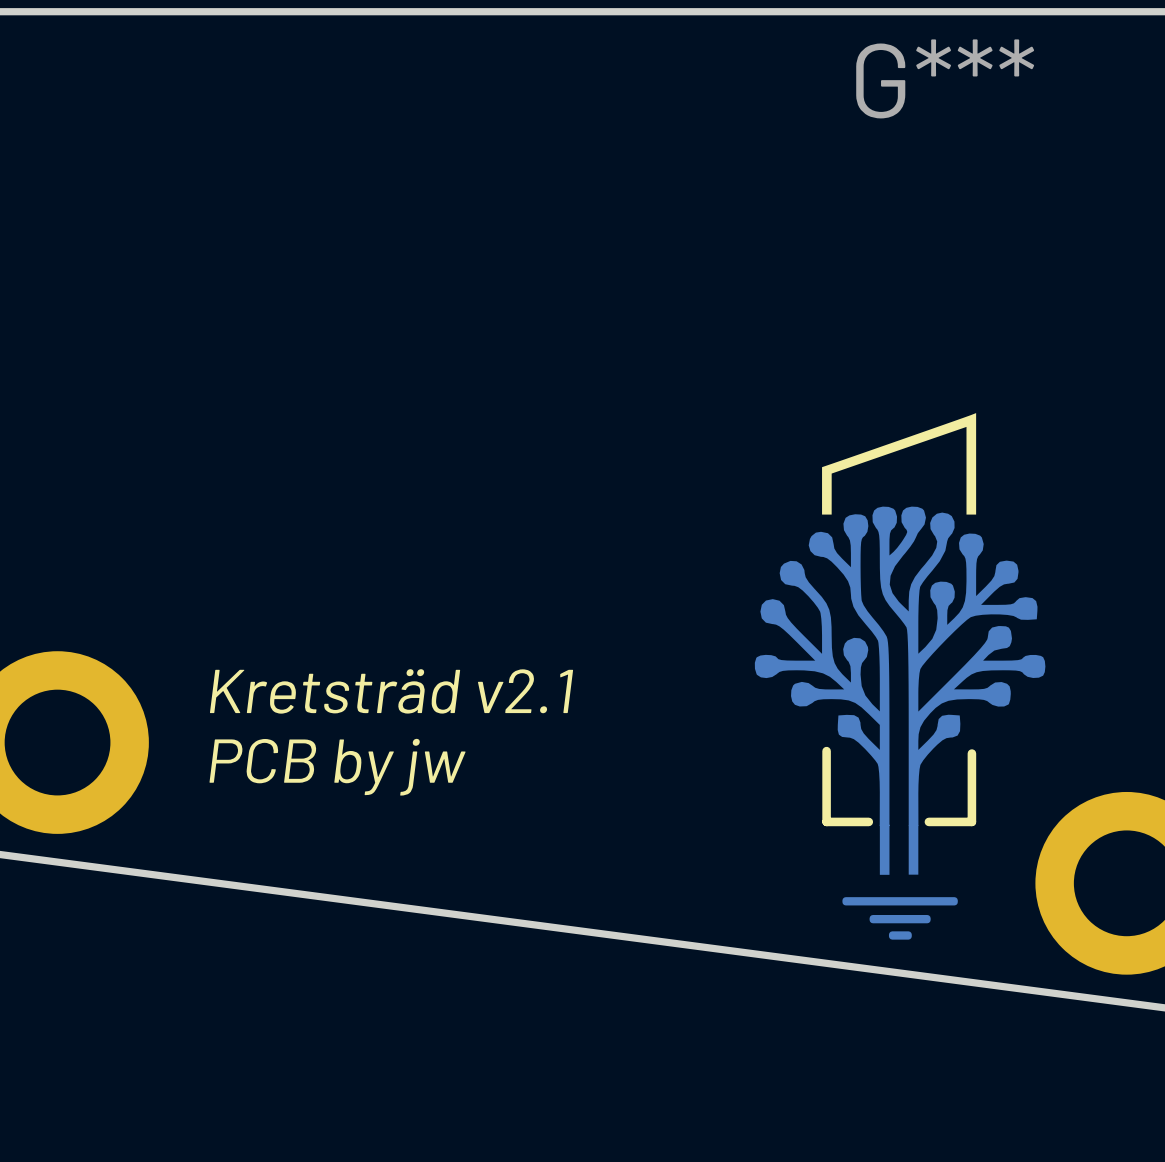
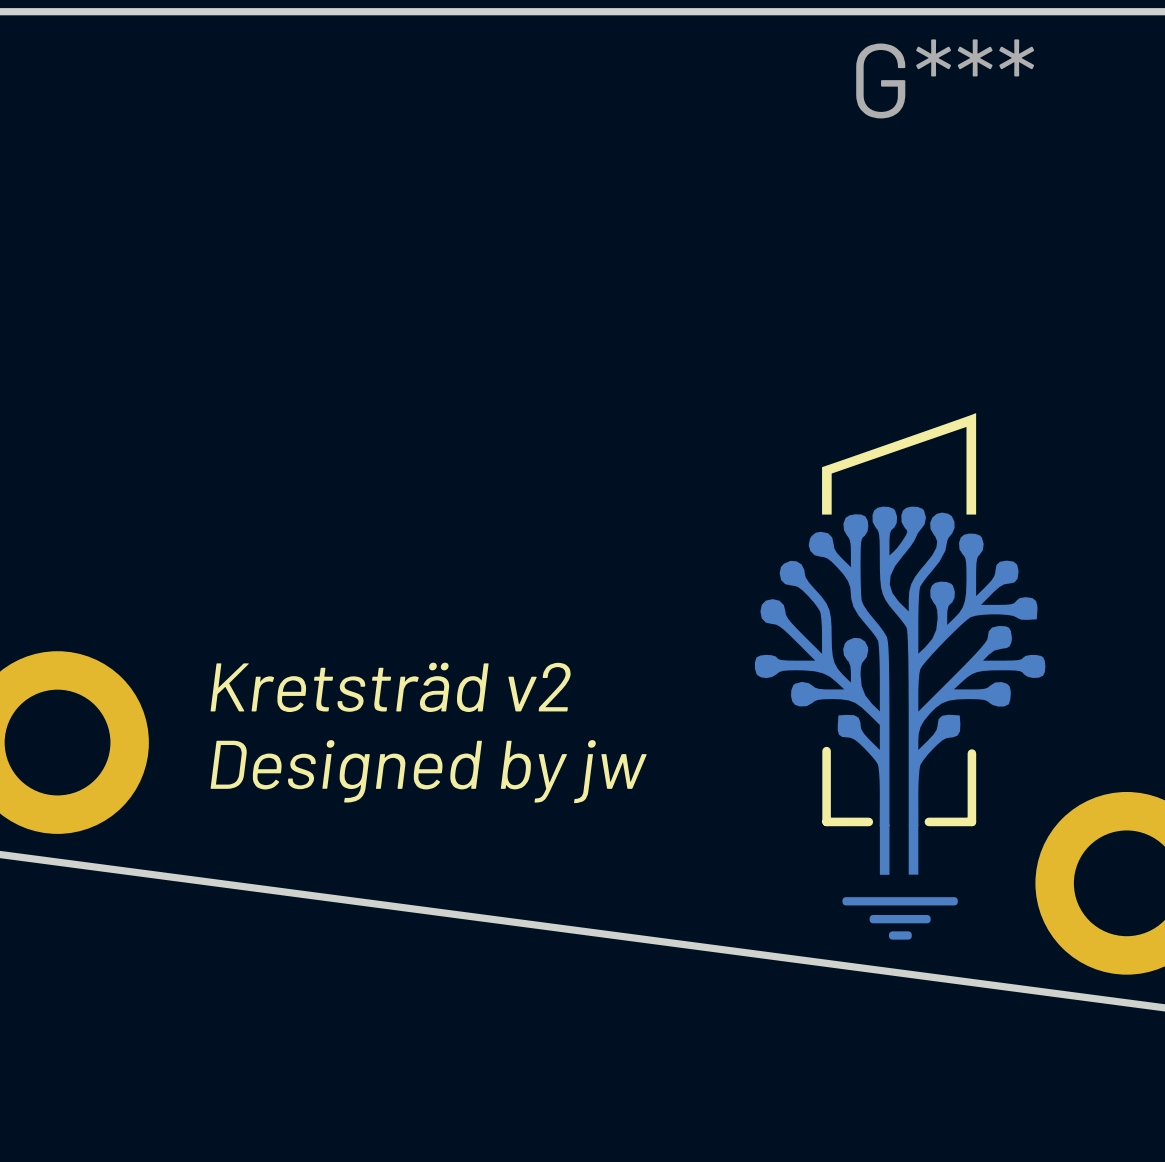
text: Kretsträd v2.1 (391, 691) -> Kretsträd v2 (390, 687)
text: PCB by jw (337, 767) -> Designed by jw (428, 771)

